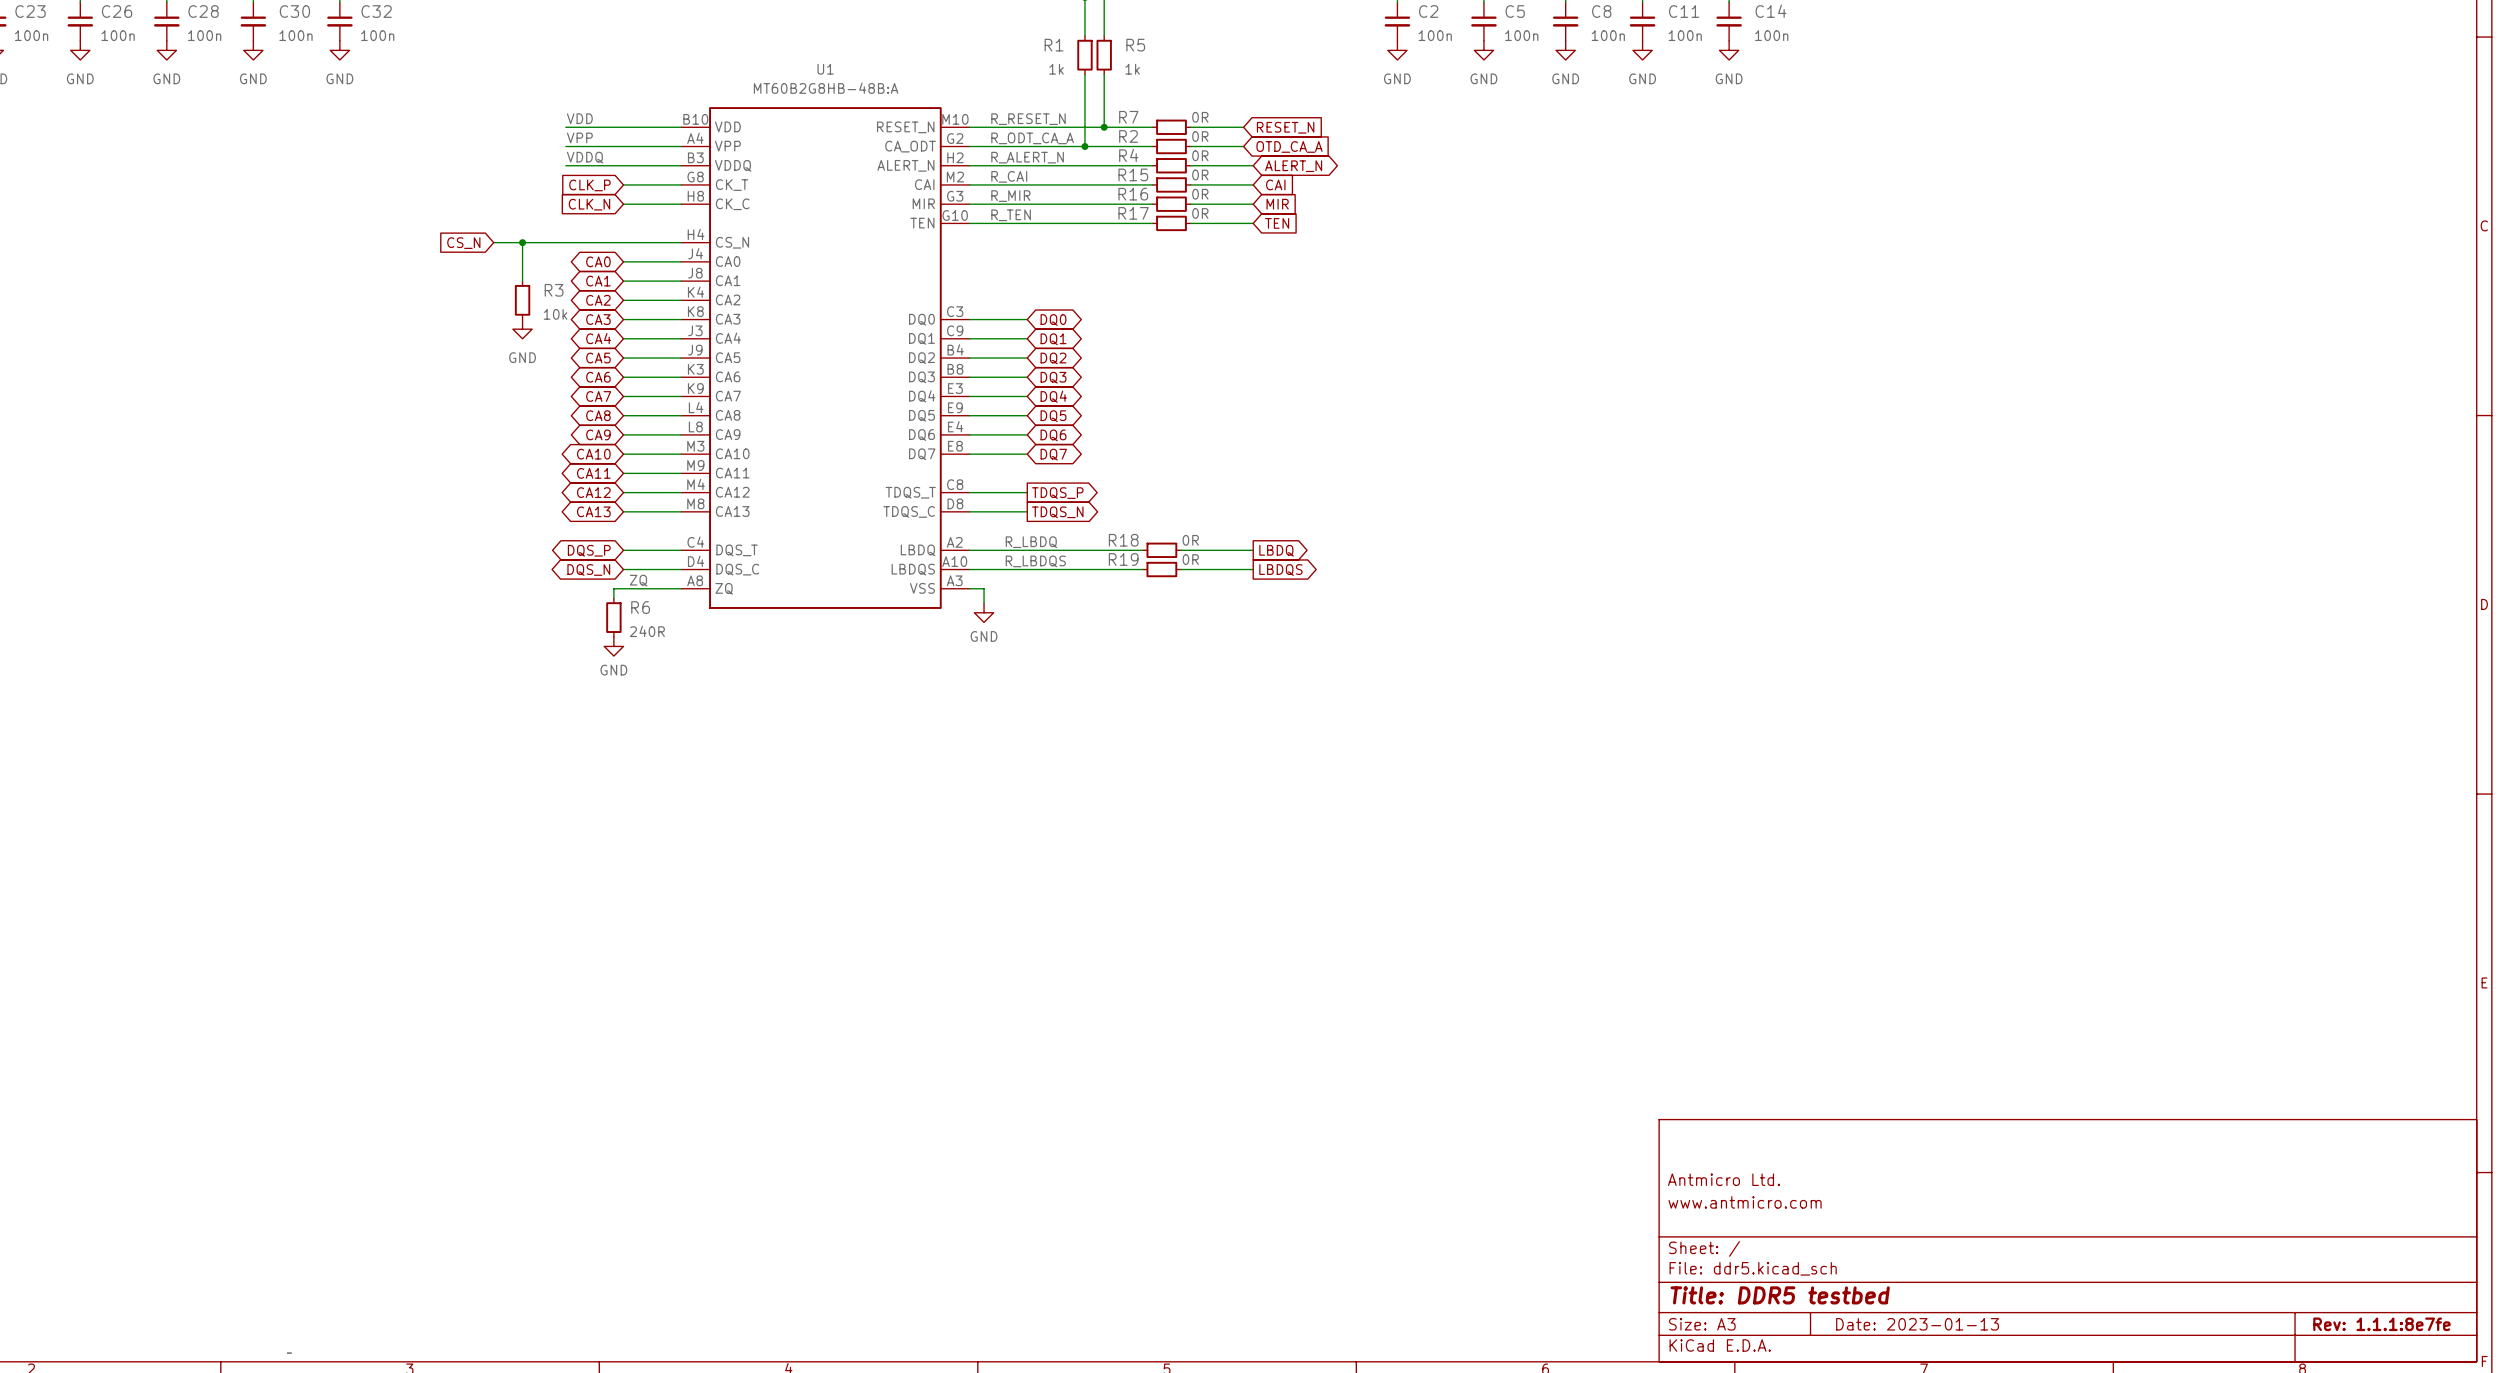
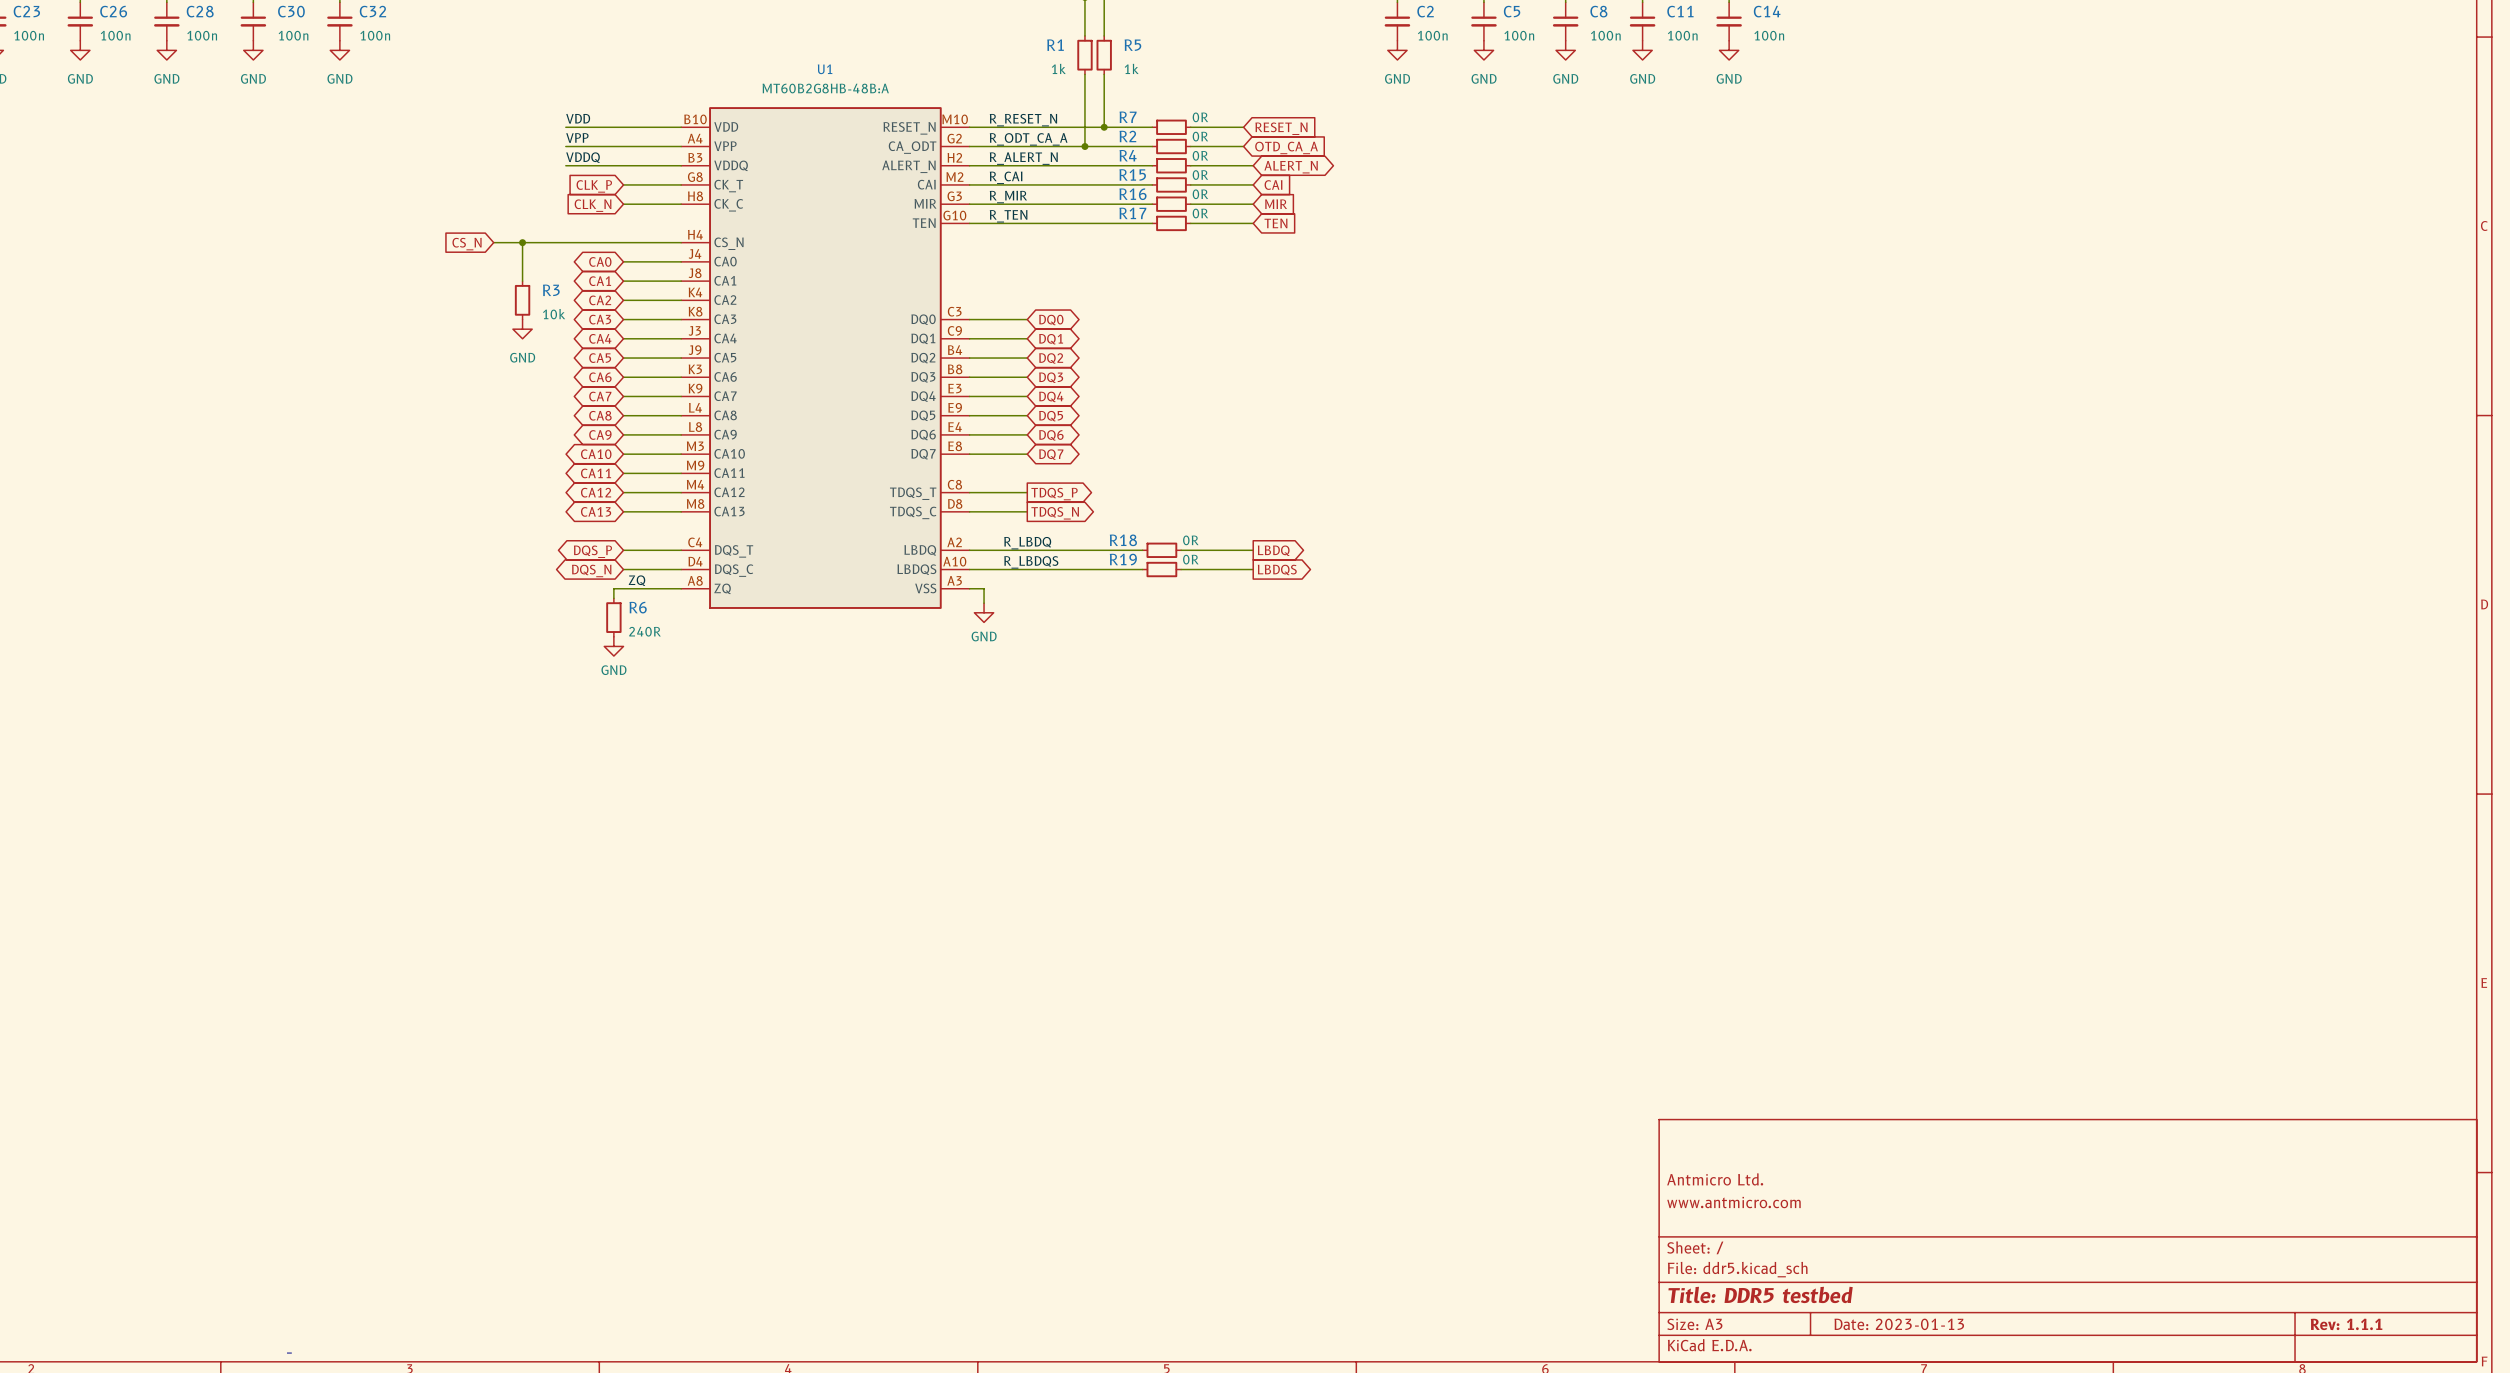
title block: Rev: 1.1.1:8e7fe (2381, 1324) -> Rev: 1.1.1 (2346, 1324)

